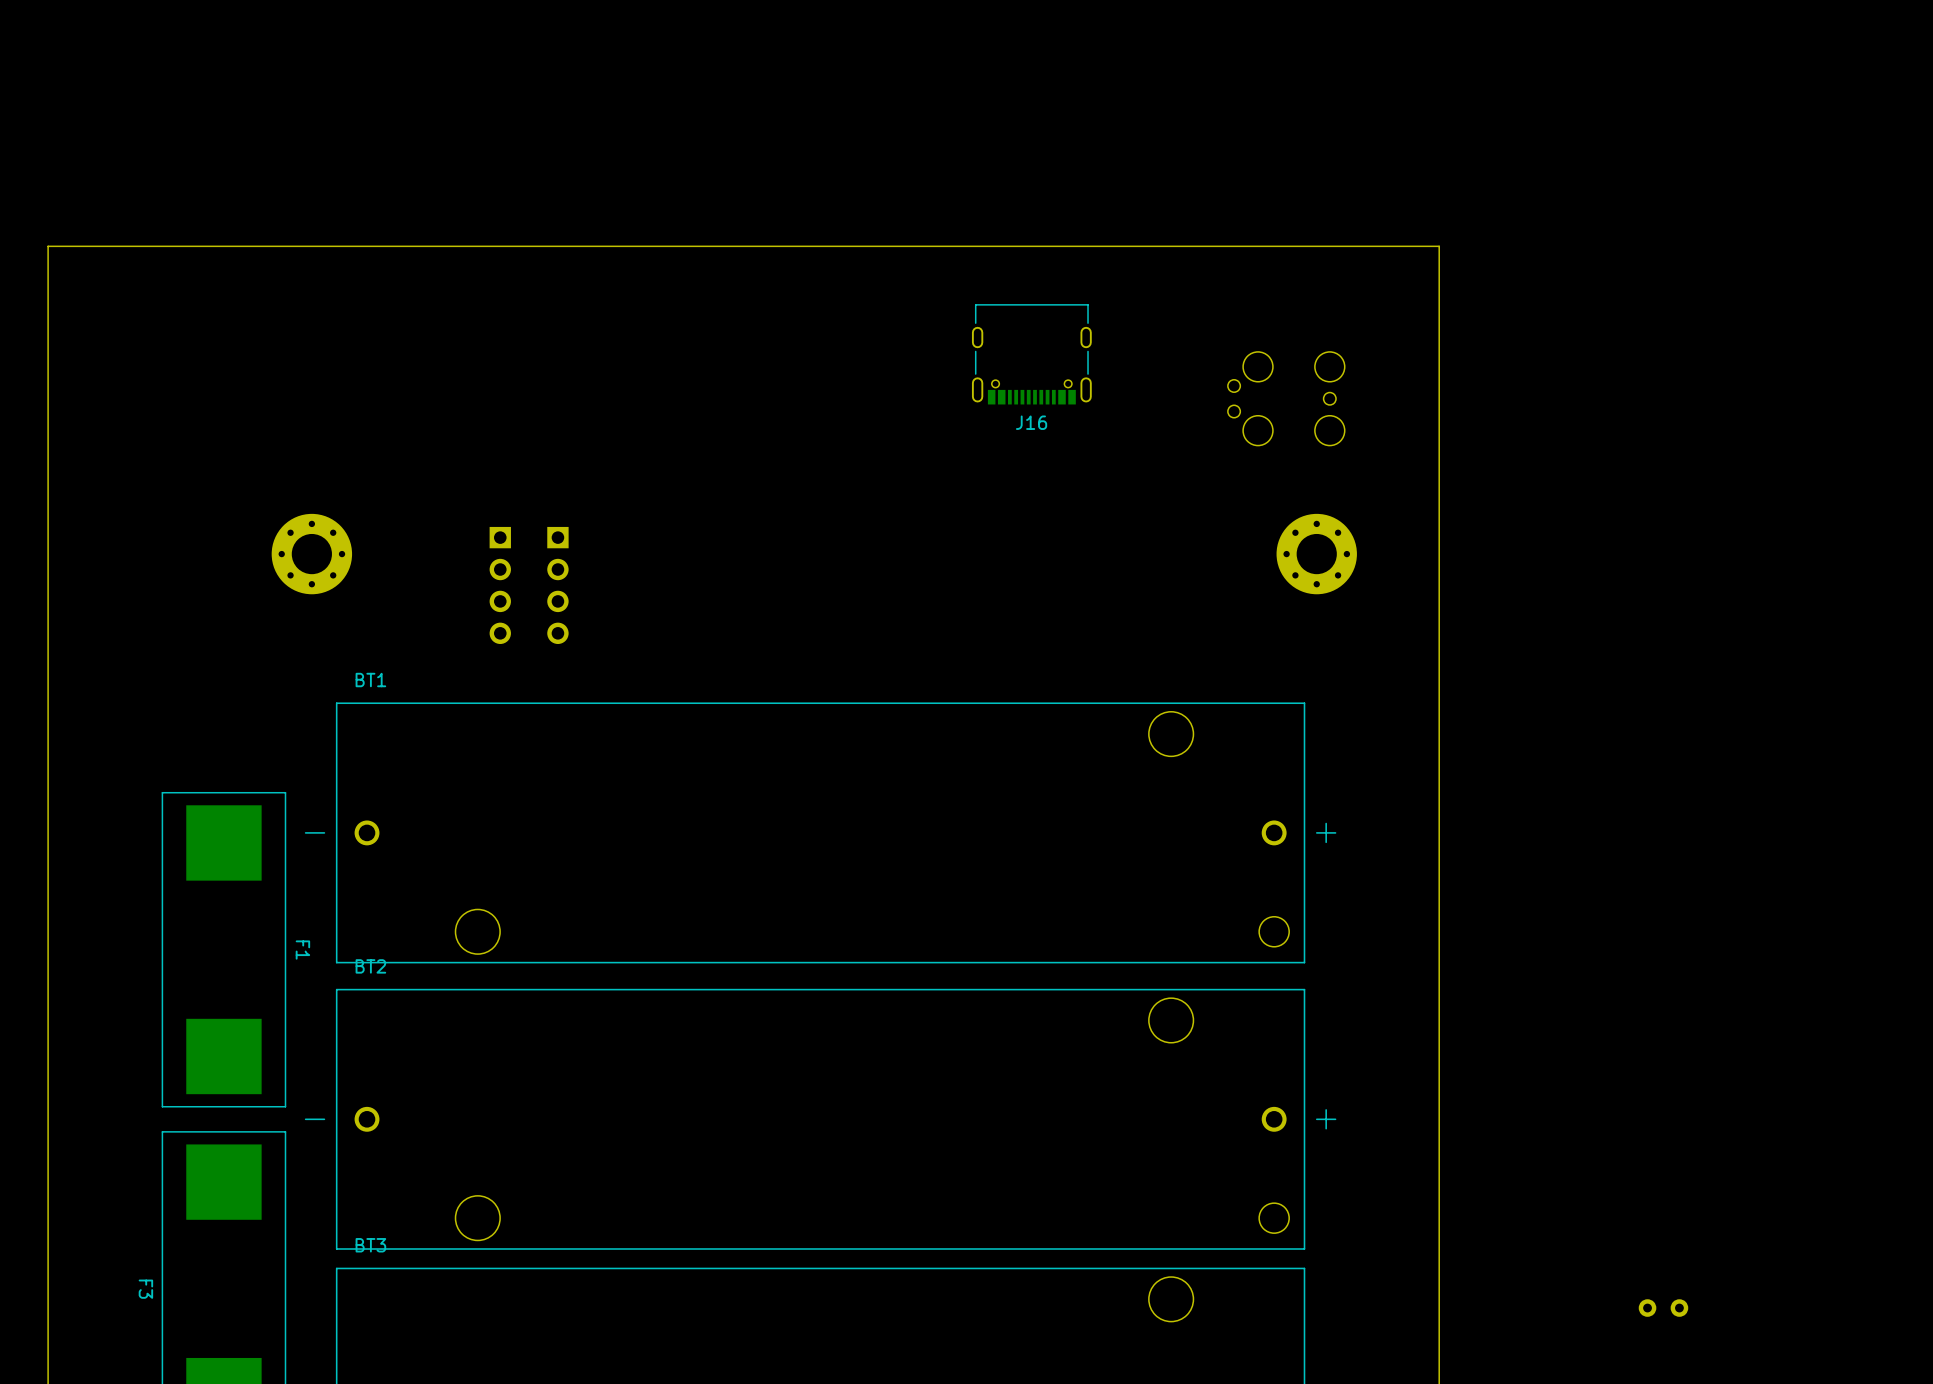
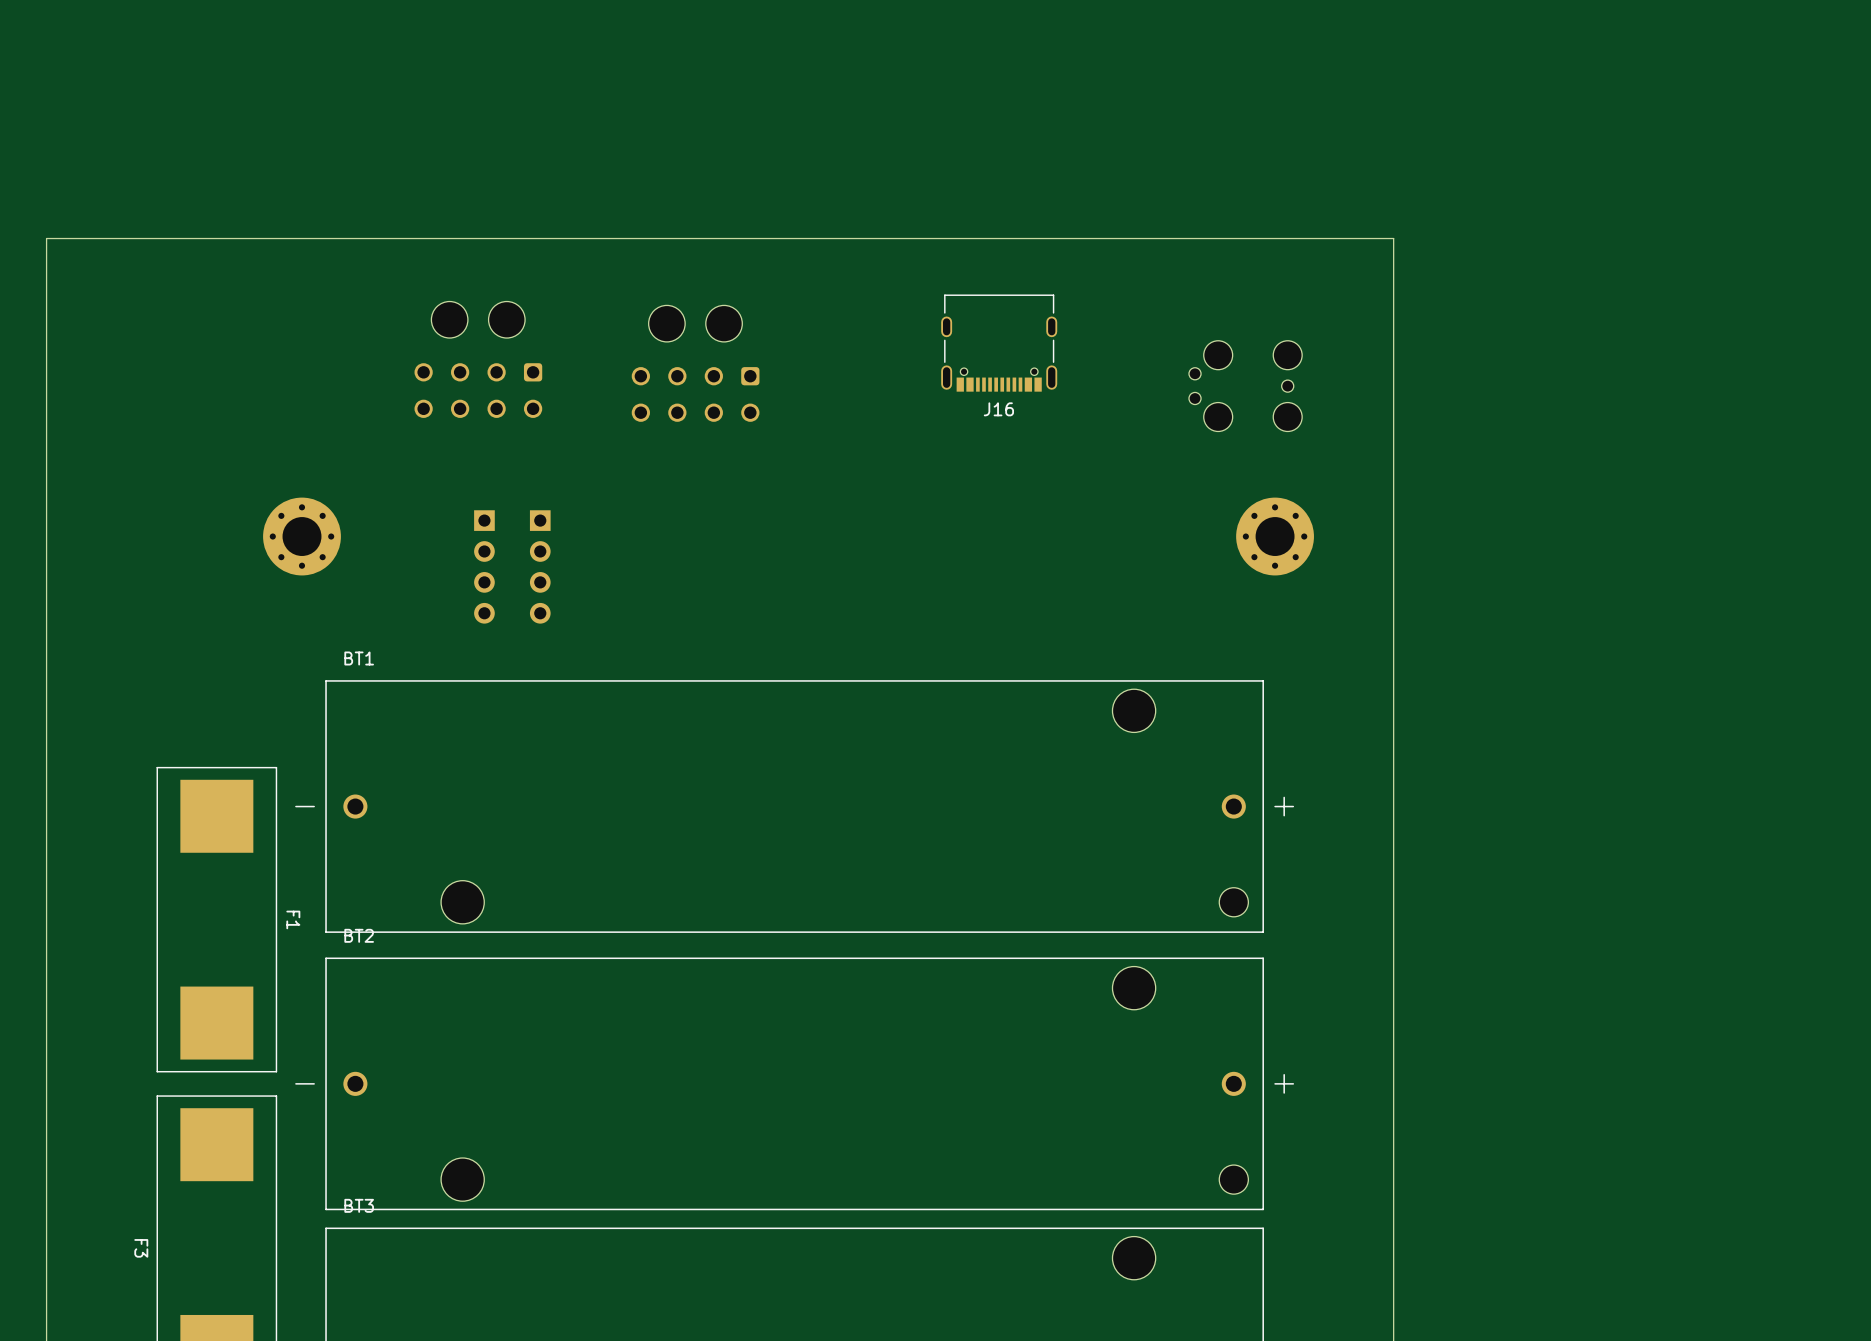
part: none -> (478, 359)
part: none -> (695, 363)
part: (1663, 1308) -> none

